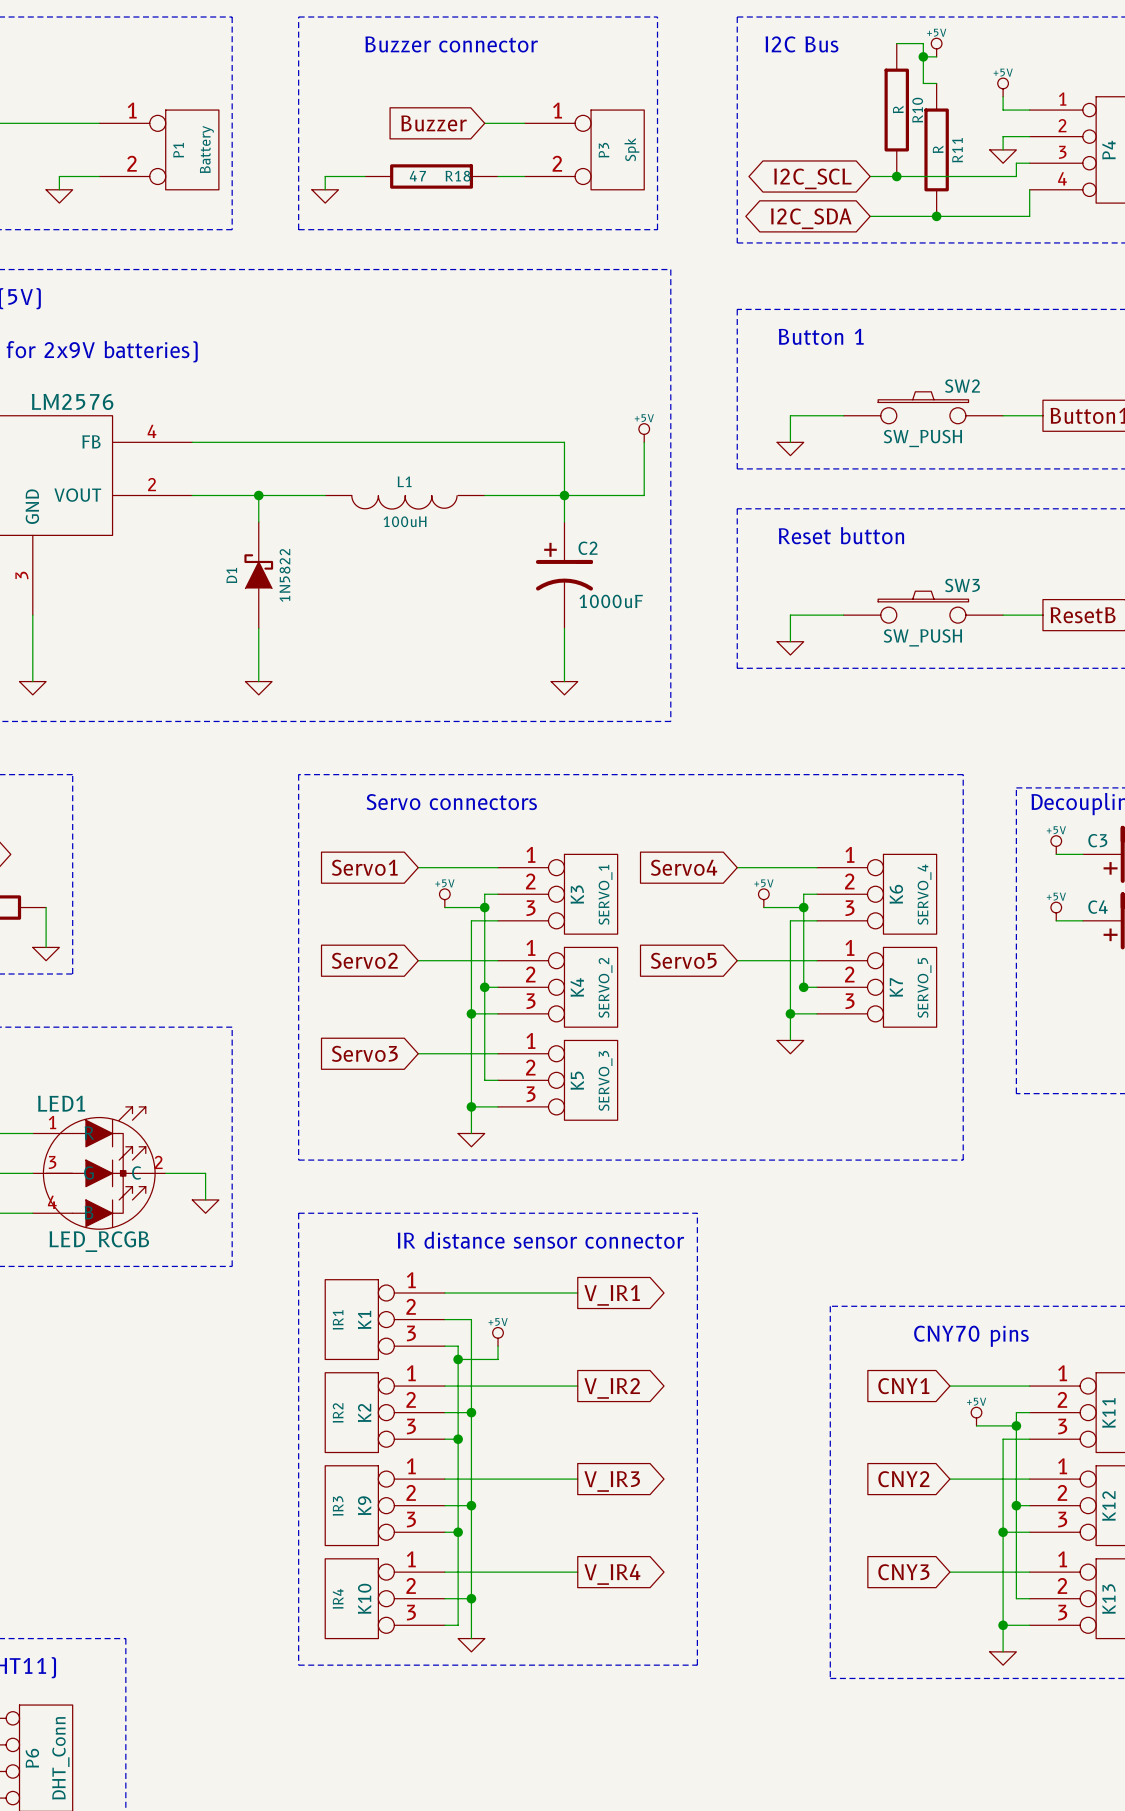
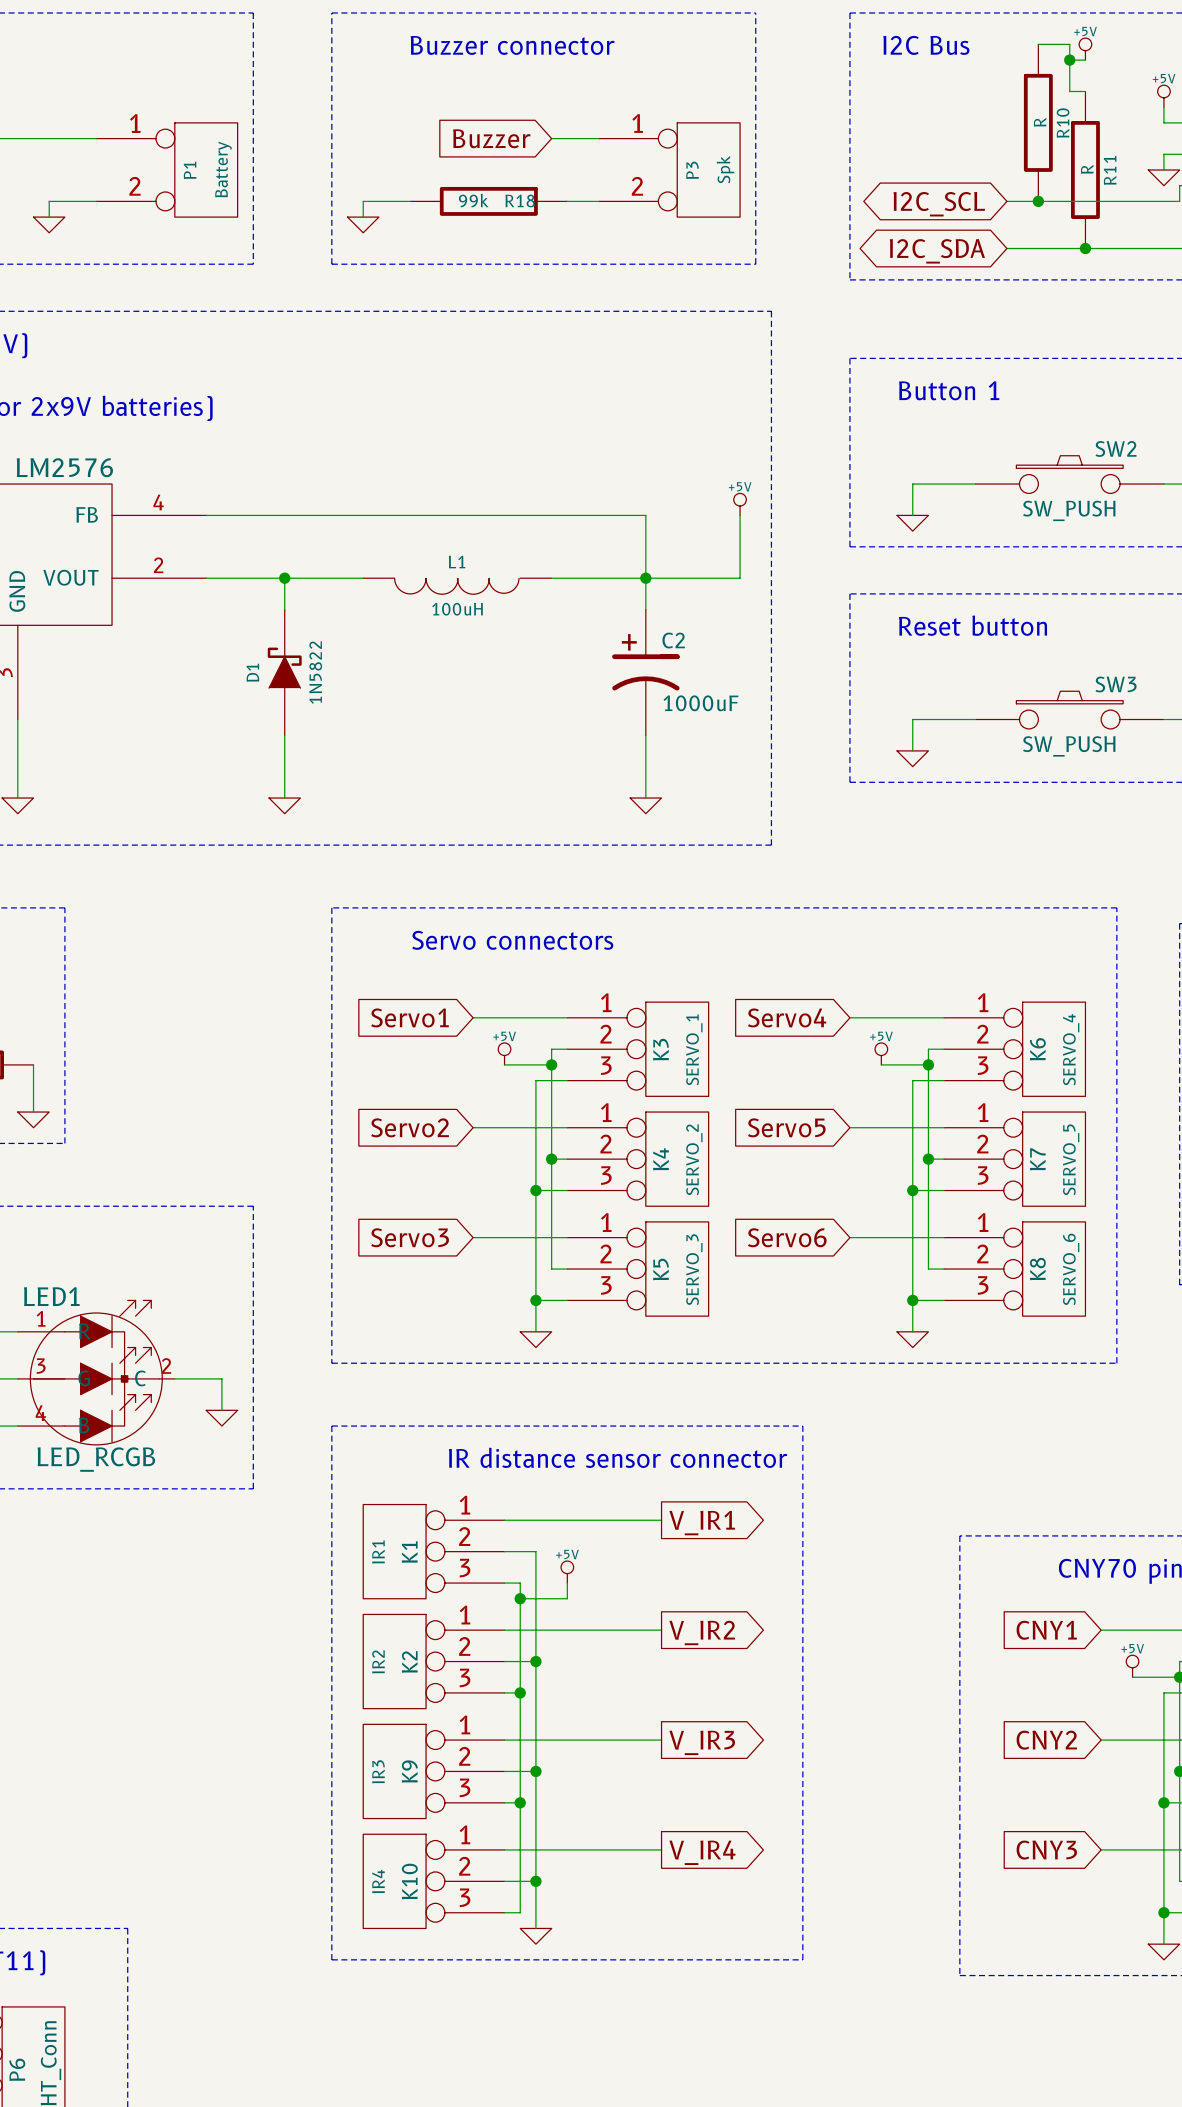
R18 value: 47 (417, 176) -> 99k (473, 200)
wire: none -> (928, 1159) (928, 1269) (944, 1269)
wire: none -> (912, 1221) (912, 1331)
power symbol position: (790, 1047) -> (912, 1339)
global label: none -> Servo6 (787, 1237)
wire: none -> (849, 1237) (944, 1237)
K8: none -> SERVO_6 (1014, 1269)
wire: none -> (912, 1300) (944, 1300)
junction: none -> (912, 1300)

